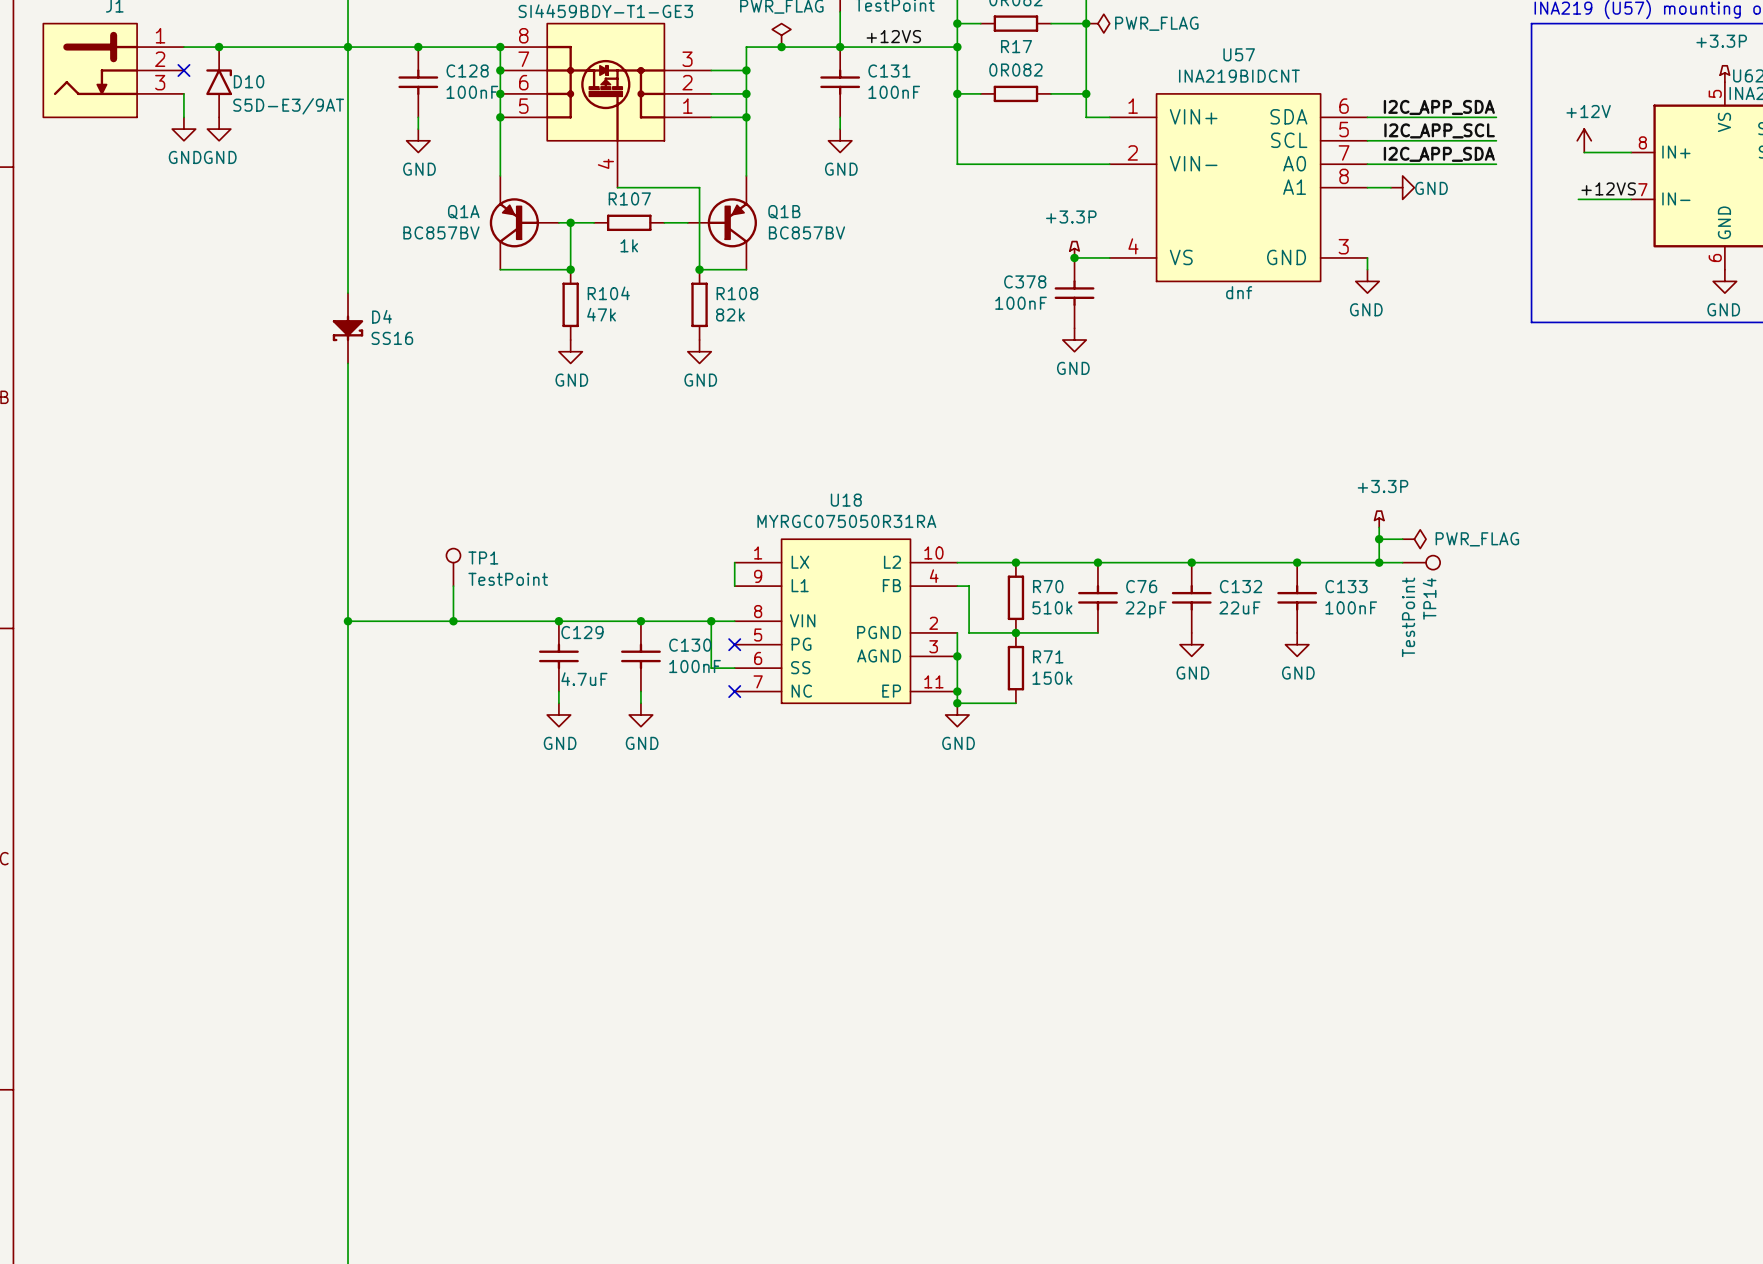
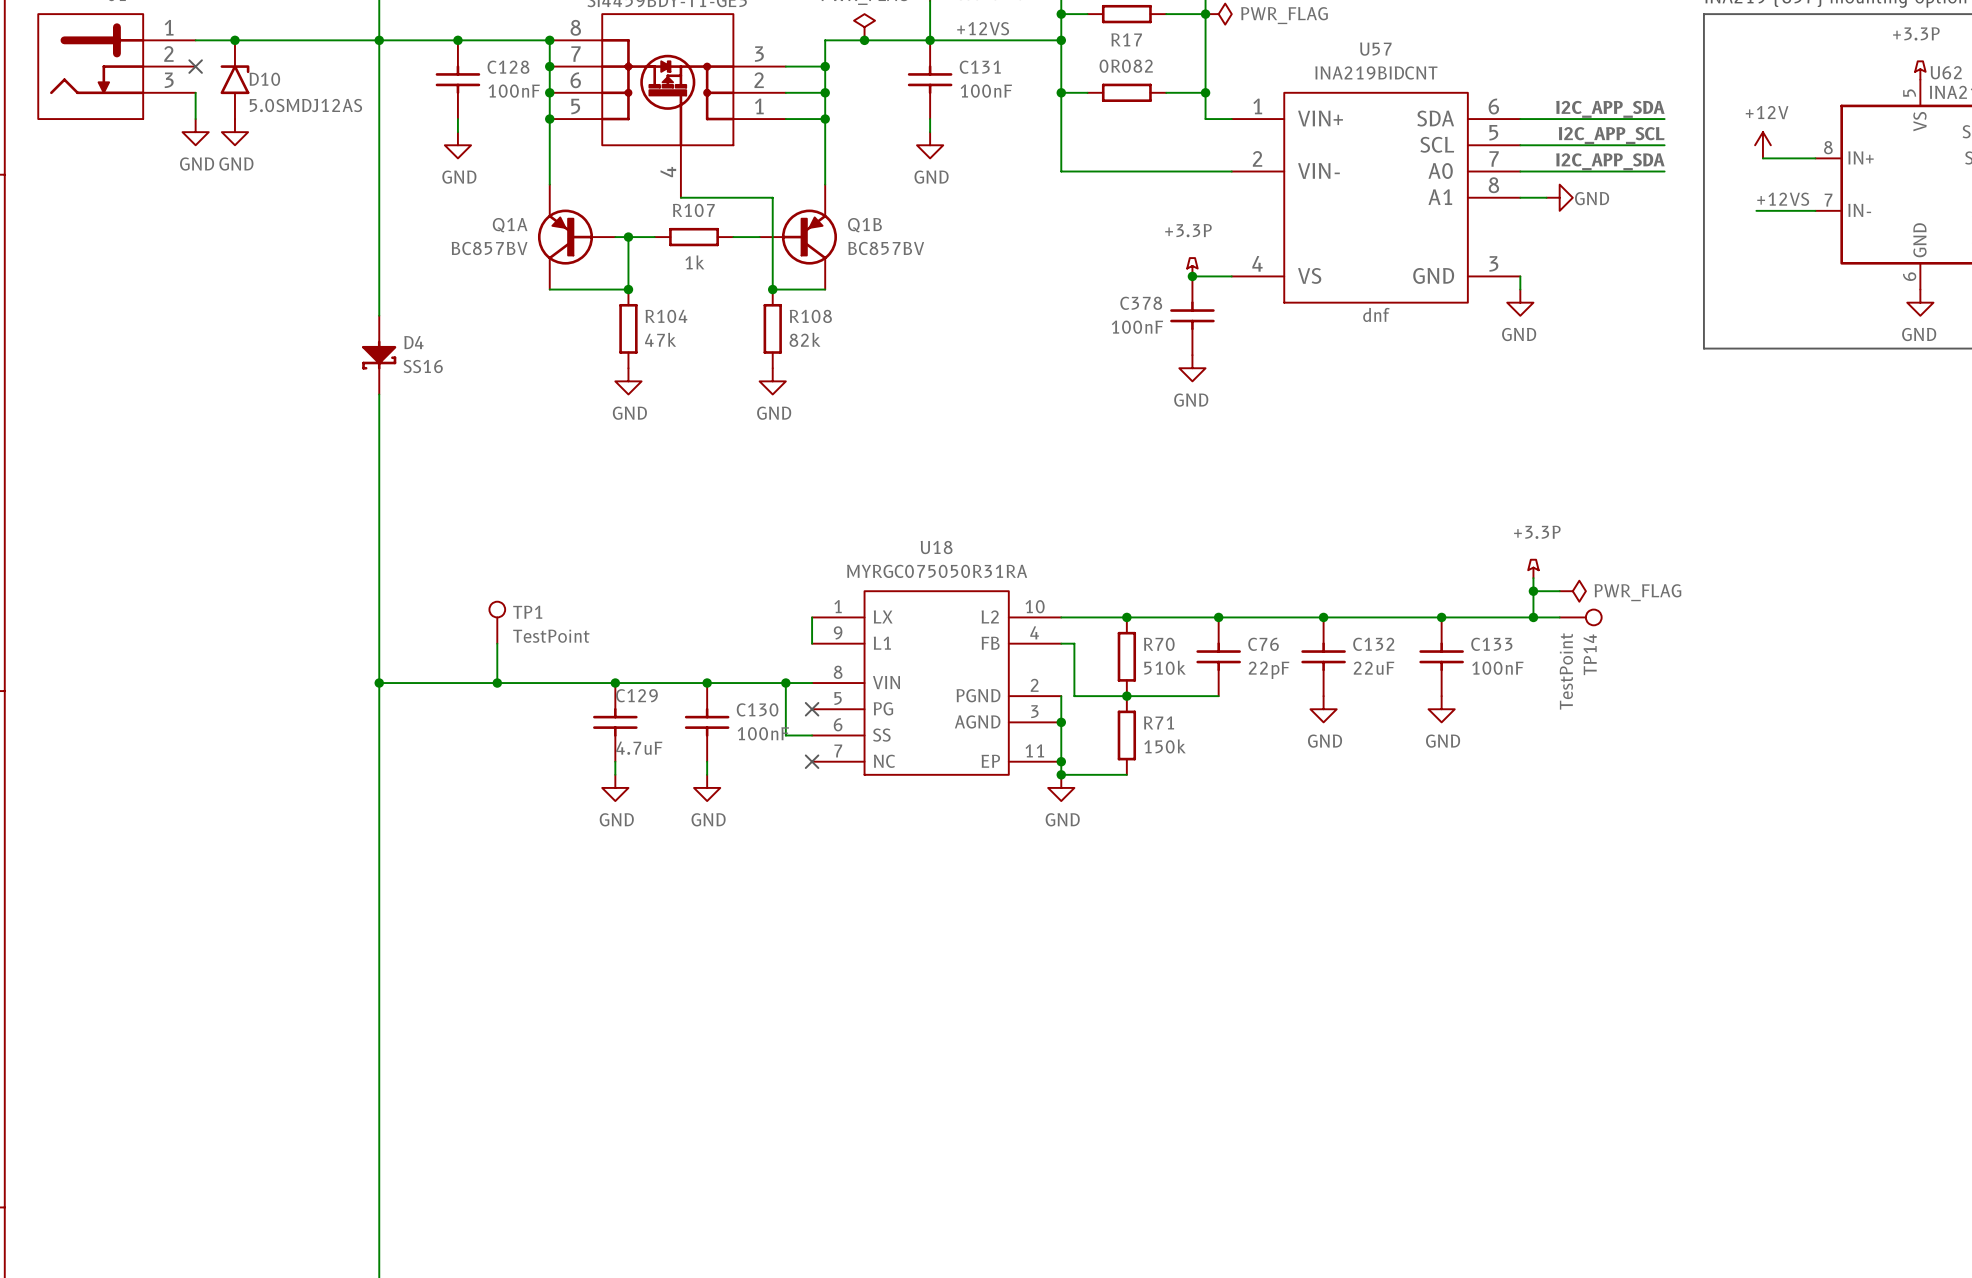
D10 value: S5D-E3/9AT (288, 106) -> 5.0SMDJ12AS (305, 105)

